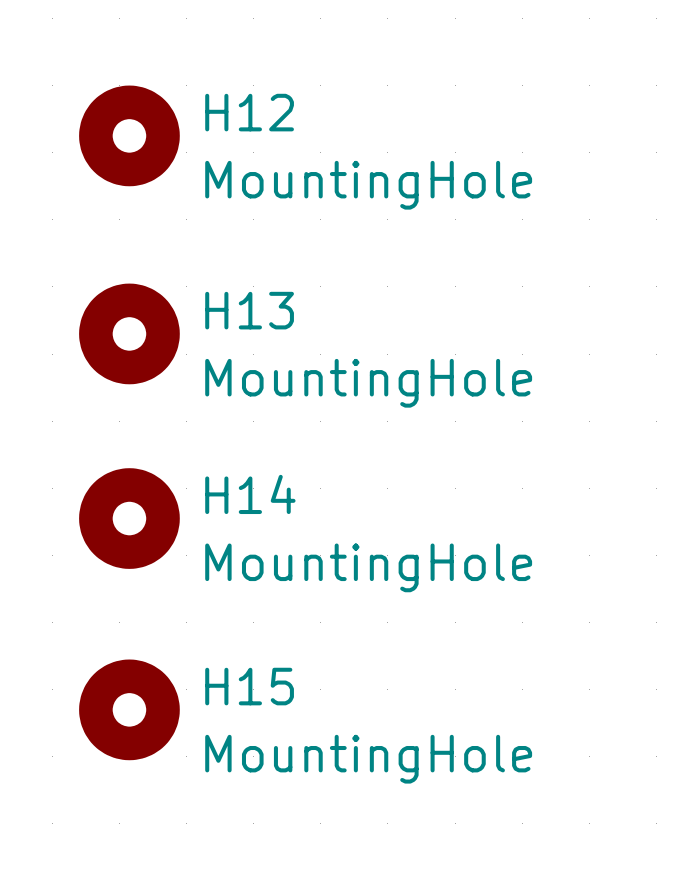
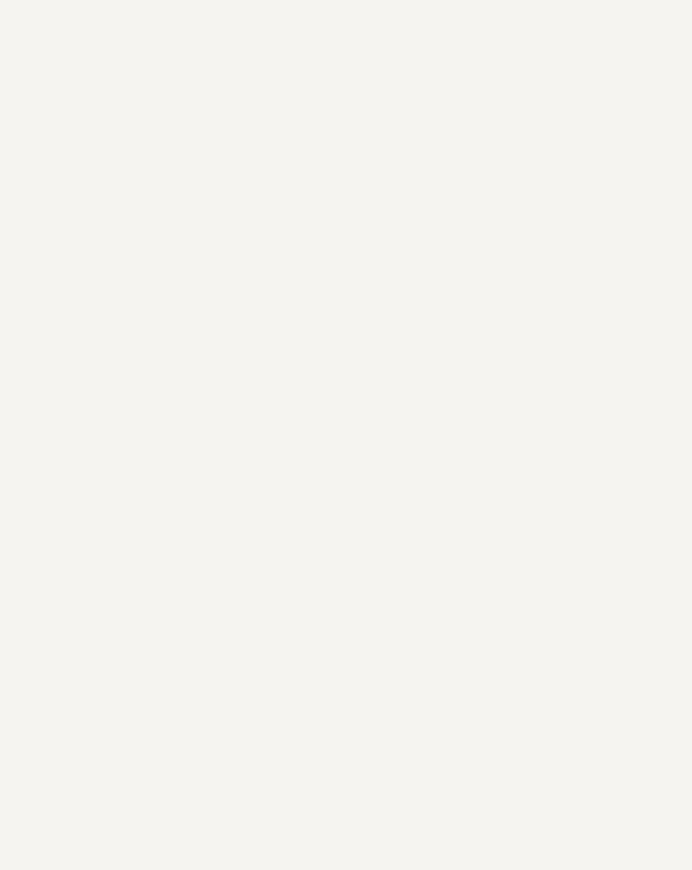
H12: MountingHole (129, 135) -> none
H13: MountingHole (129, 333) -> none
H14: MountingHole (129, 518) -> none
H15: MountingHole (129, 709) -> none

